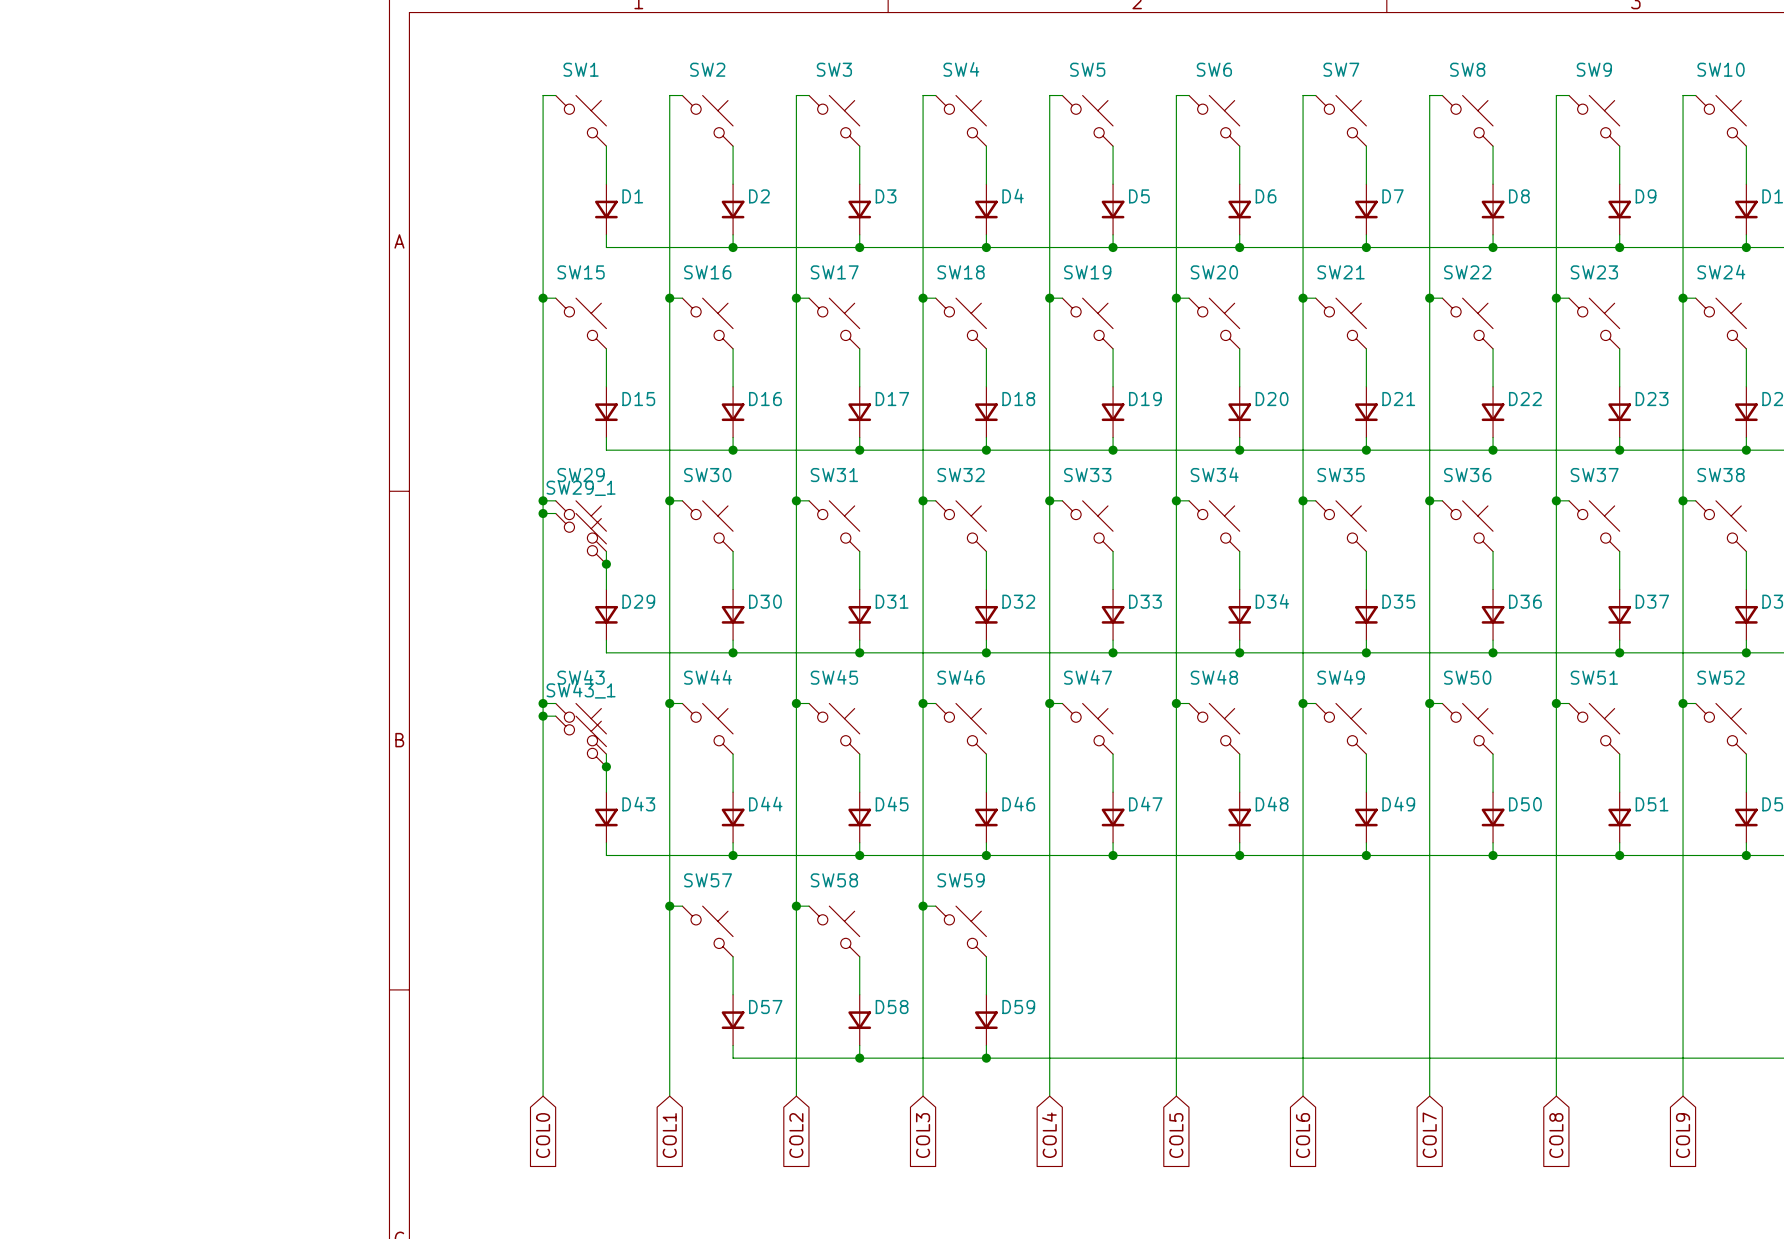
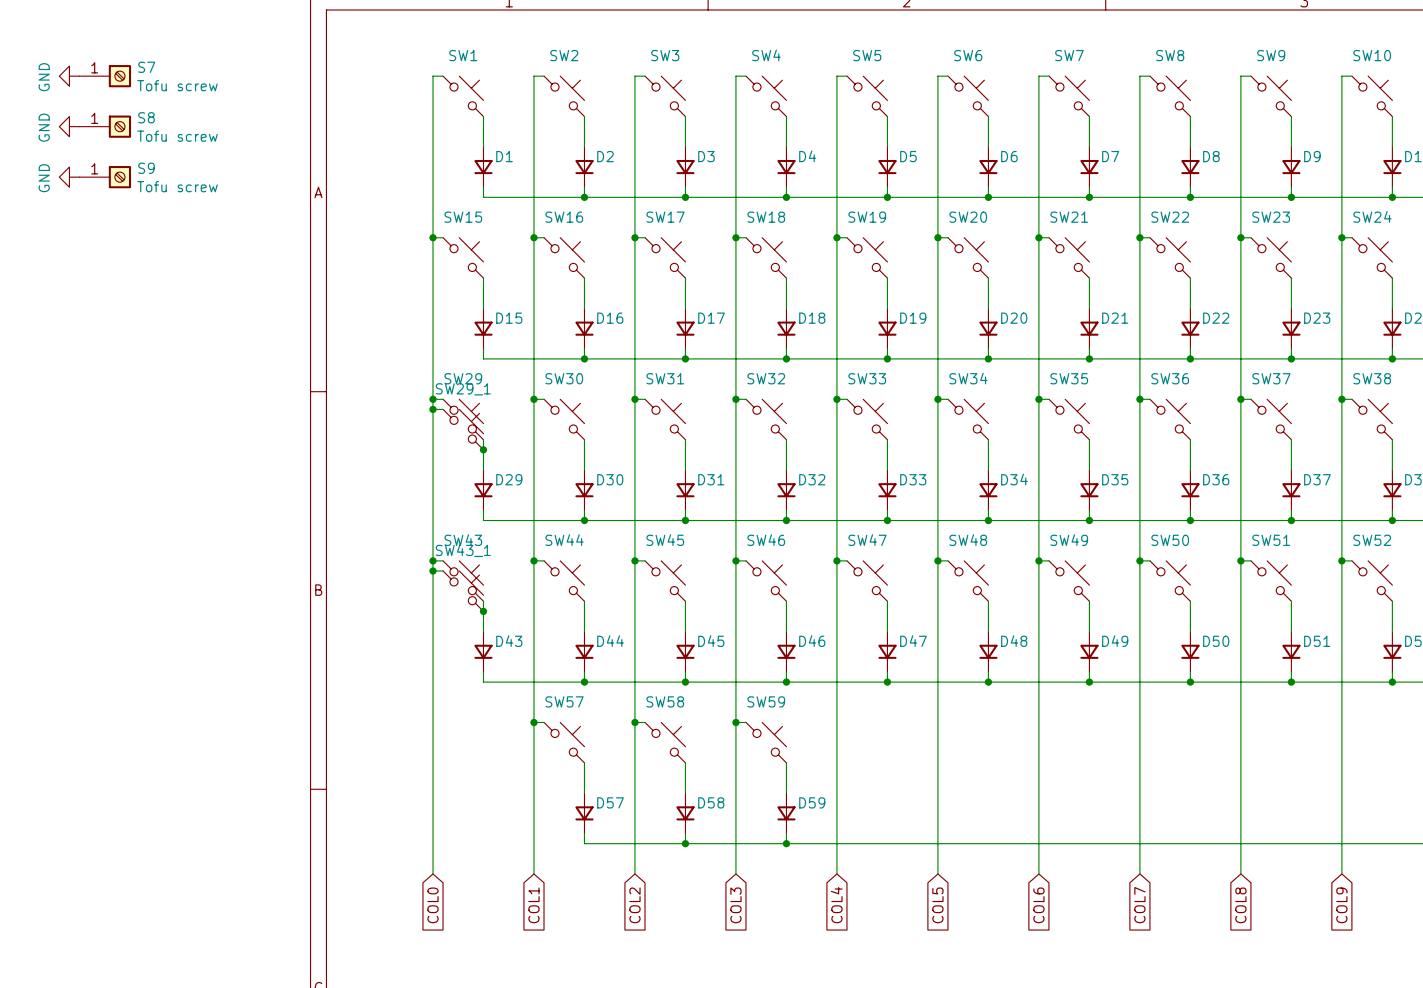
power symbol: none -> GND (69, 76)
S7: none -> Tofu screw (105, 76)
power symbol: none -> GND (69, 126)
S8: none -> Tofu screw (105, 126)
power symbol: none -> GND (69, 177)
S9: none -> Tofu screw (105, 177)

